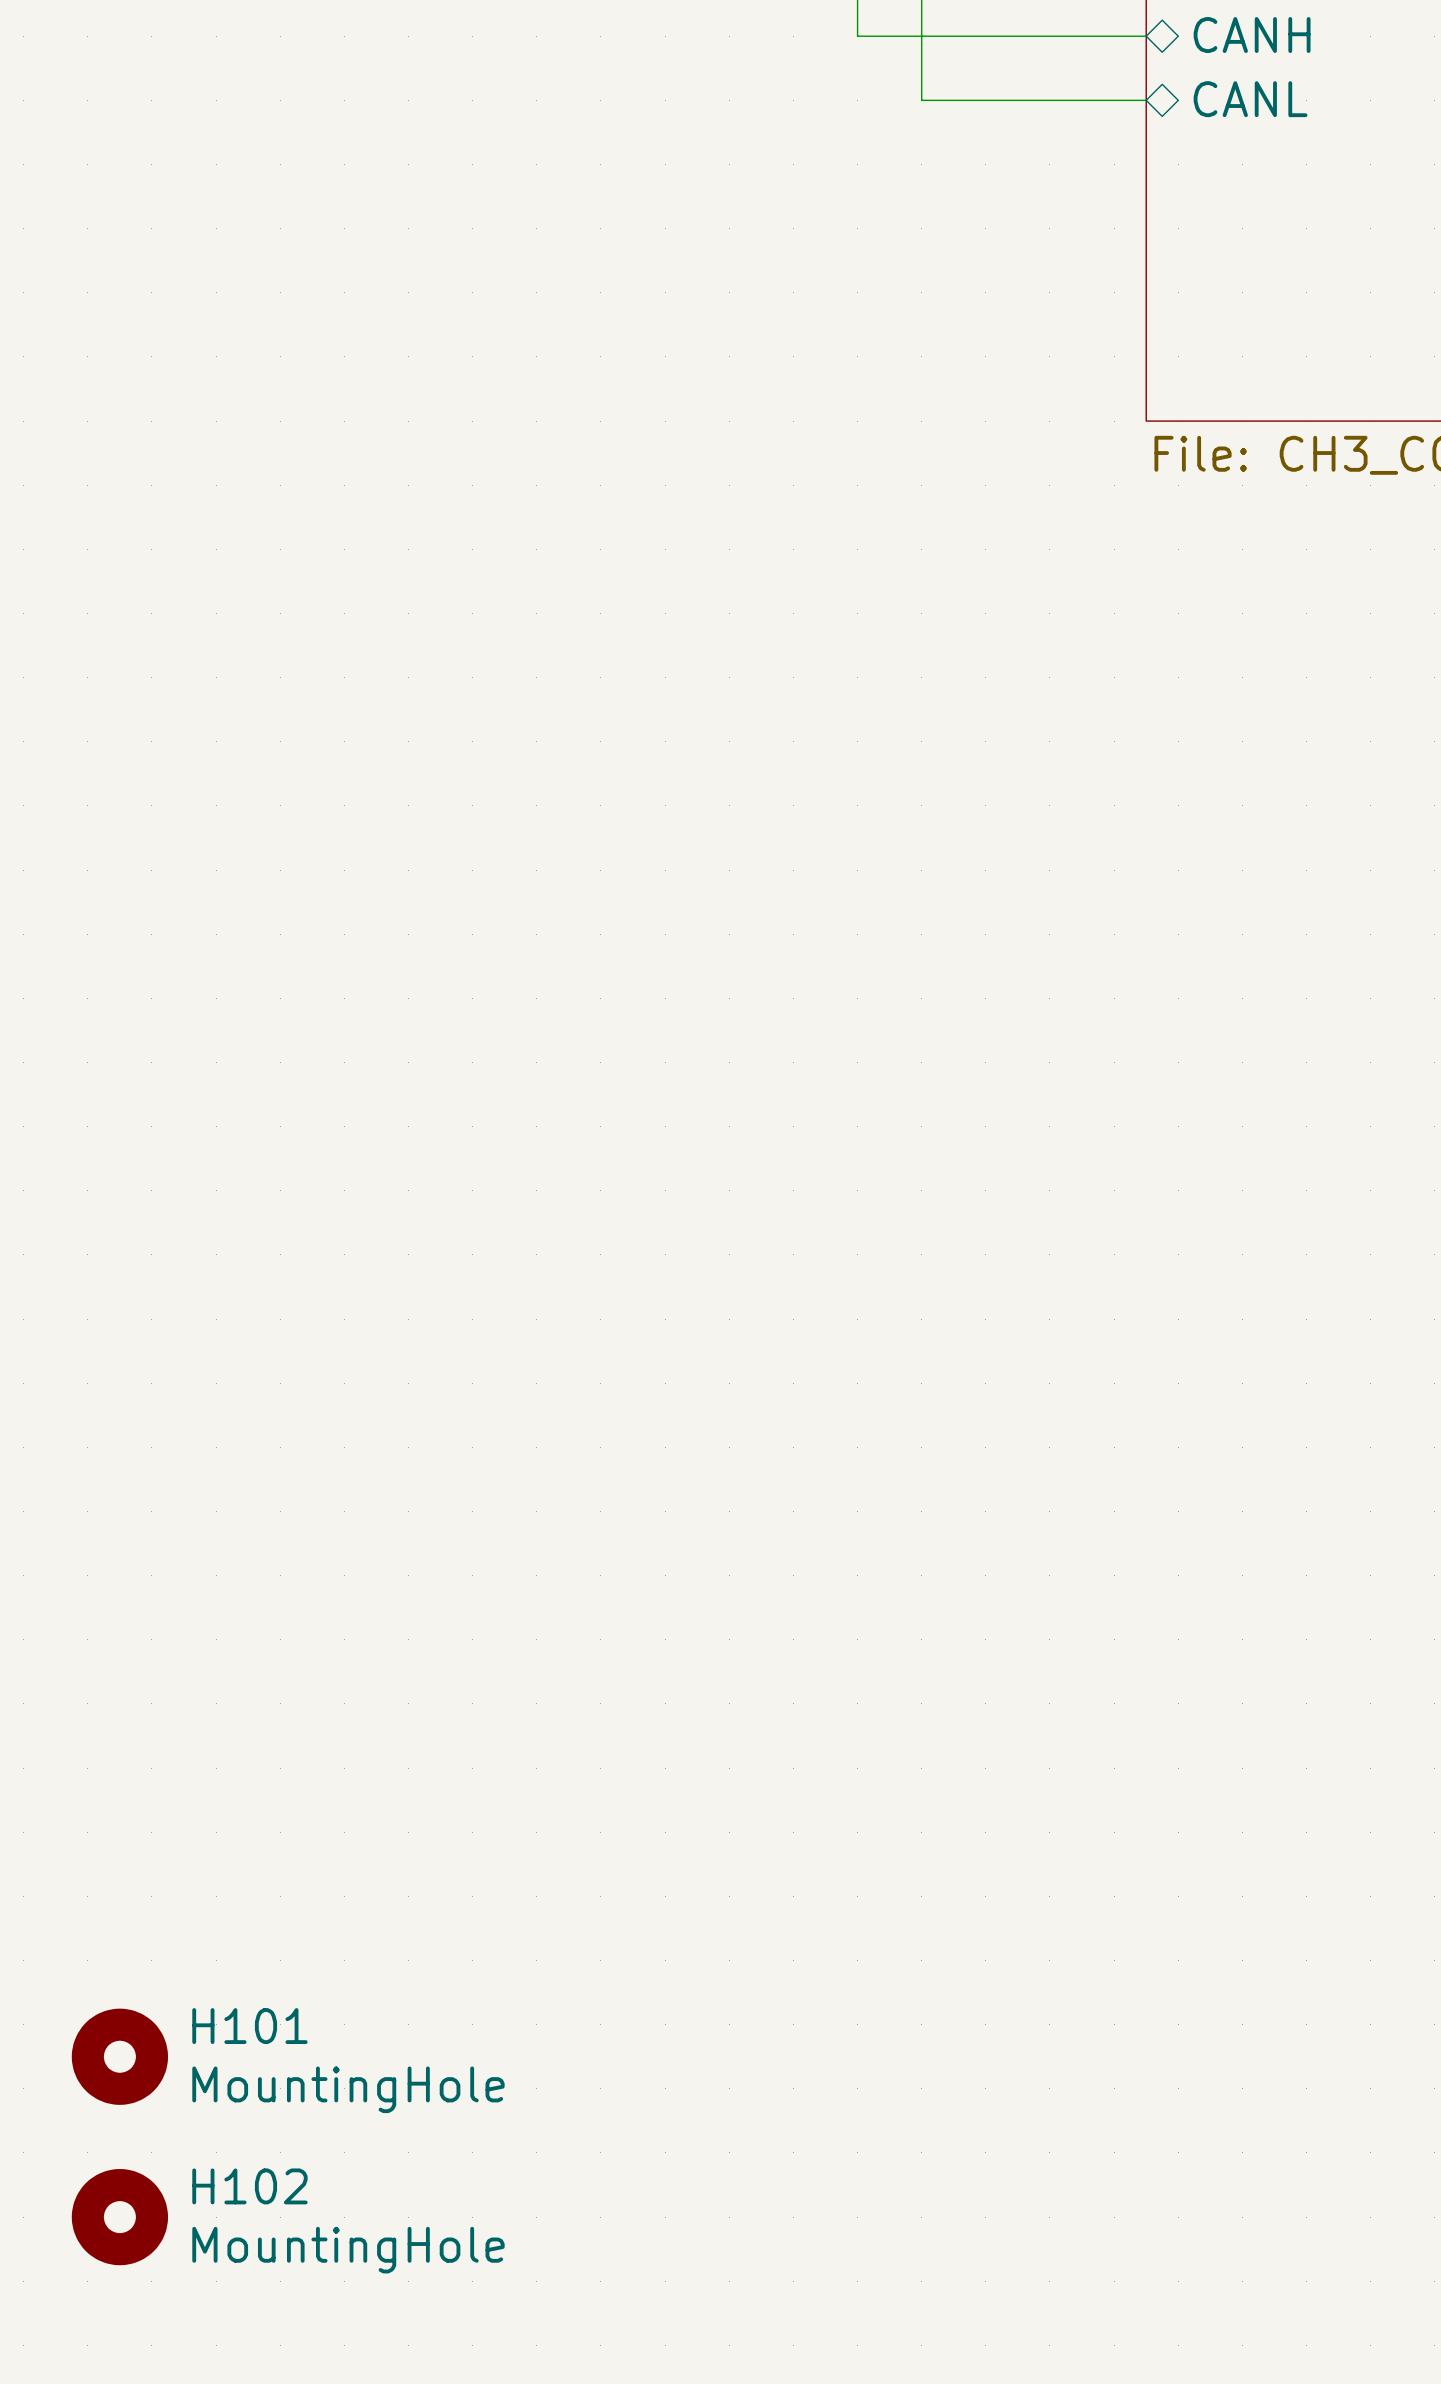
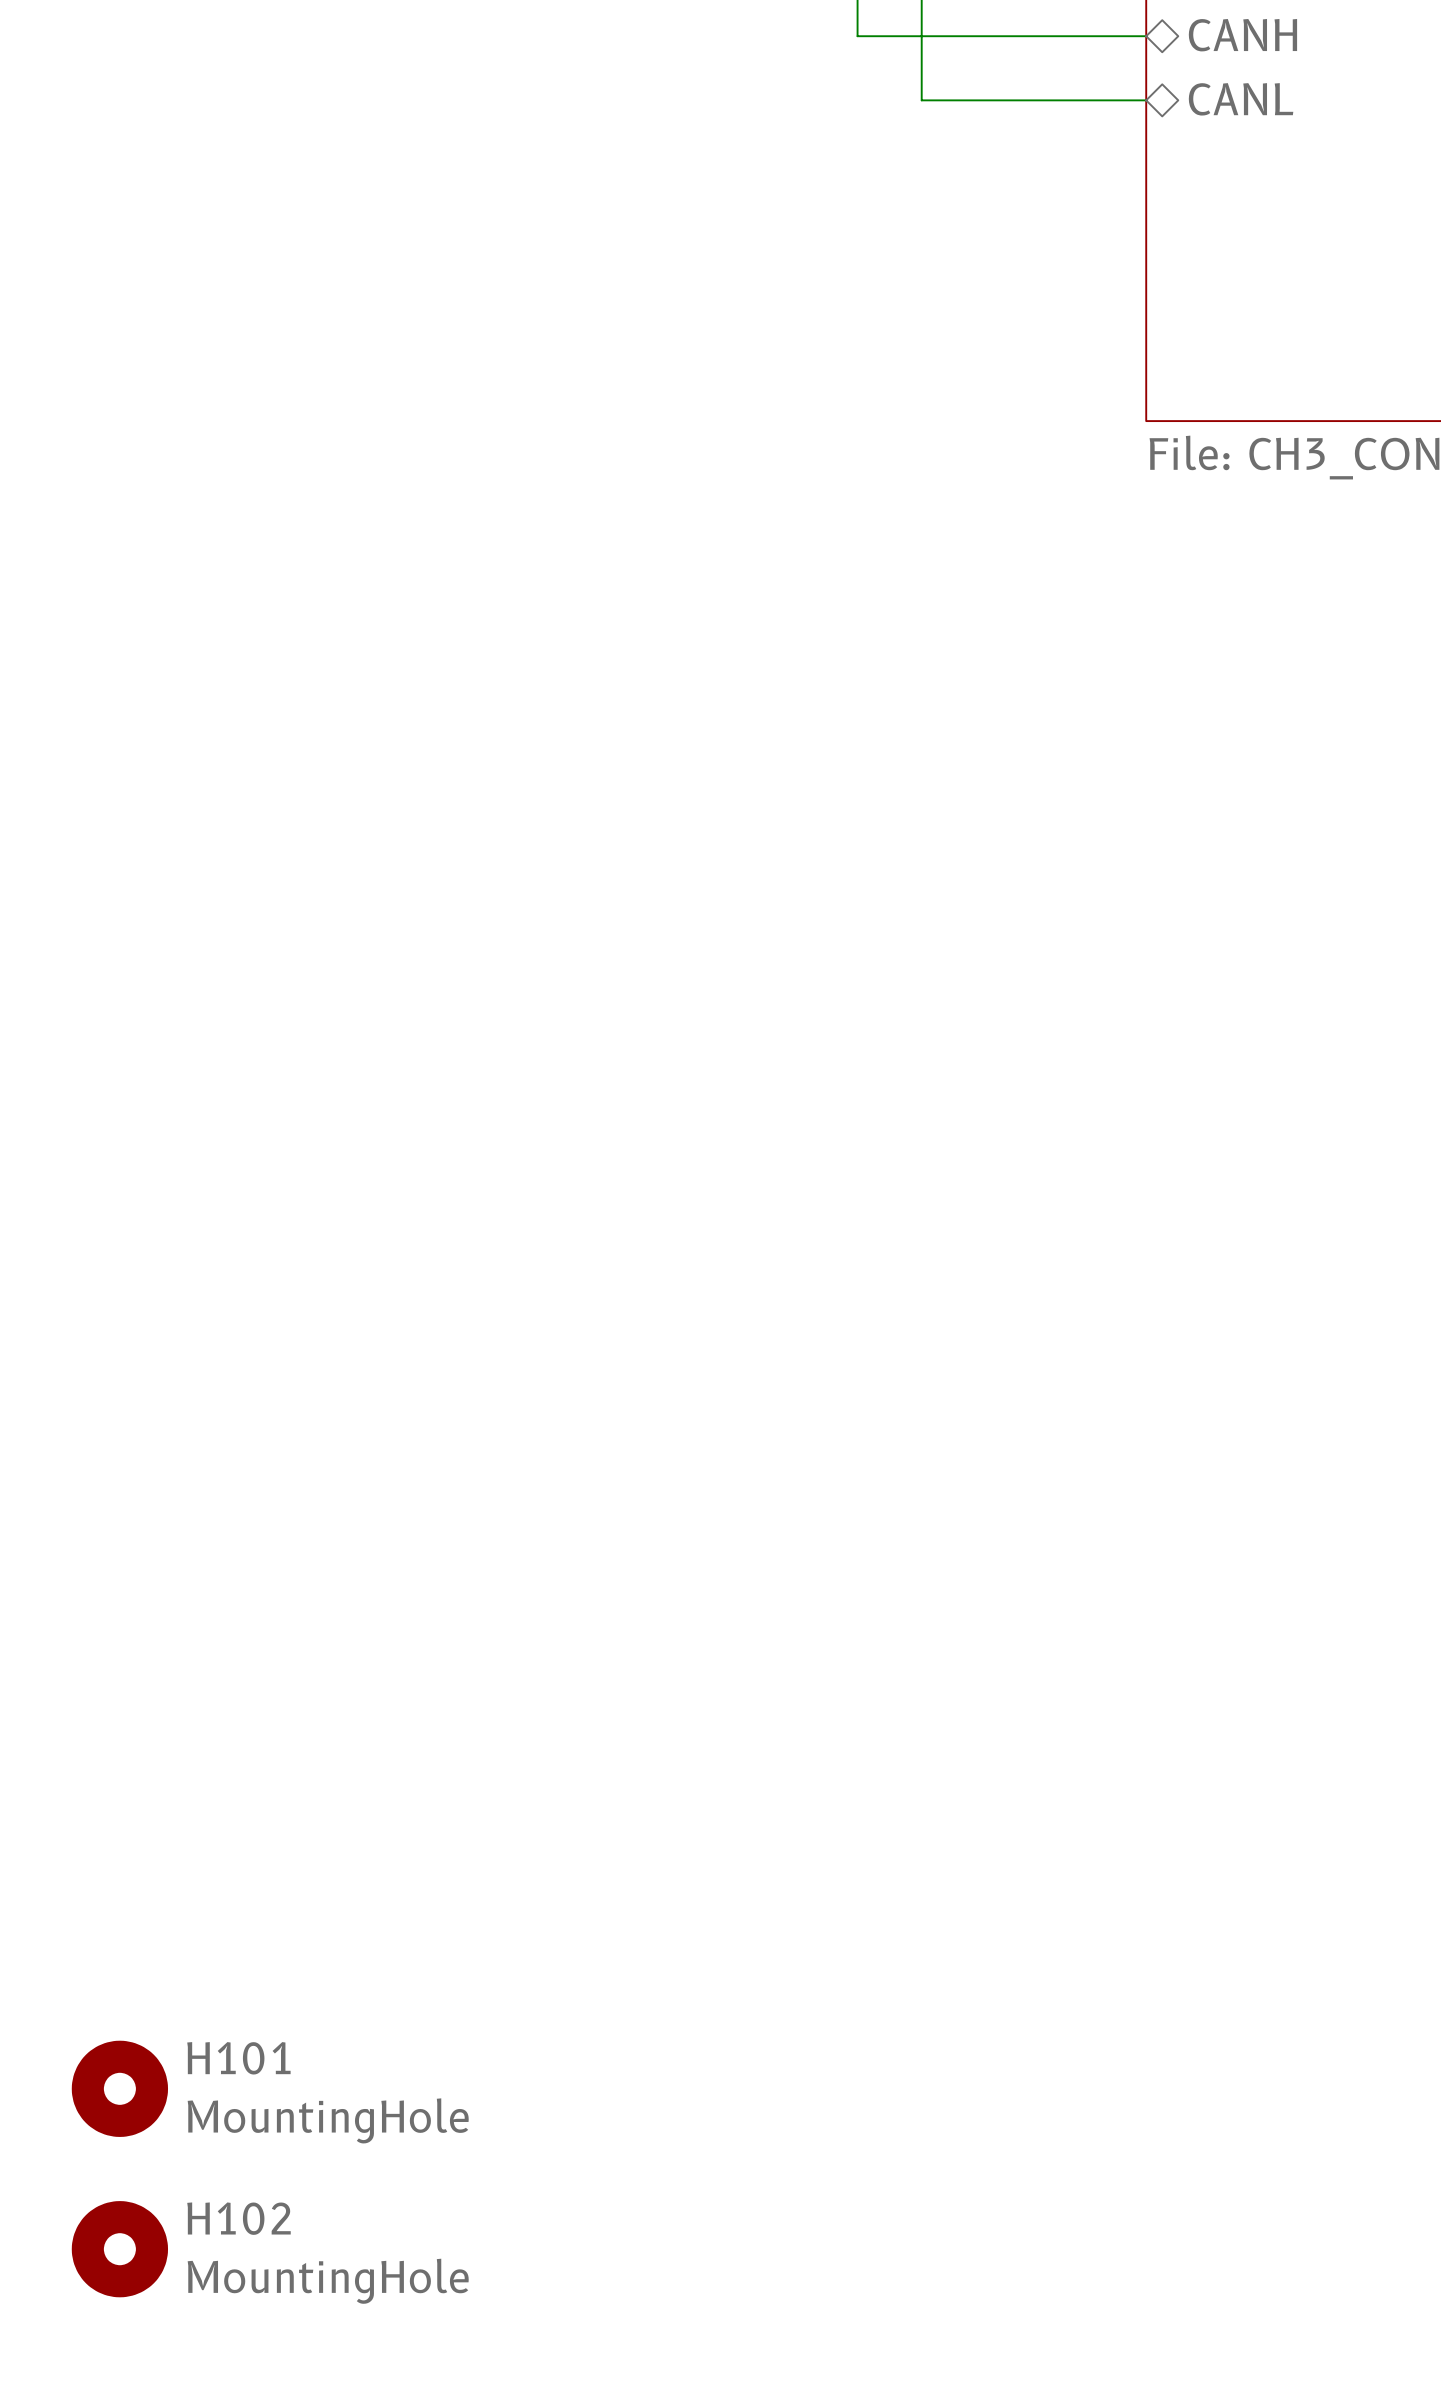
H101 position: (119, 2056) -> (119, 2088)
H102 position: (119, 2217) -> (119, 2249)

